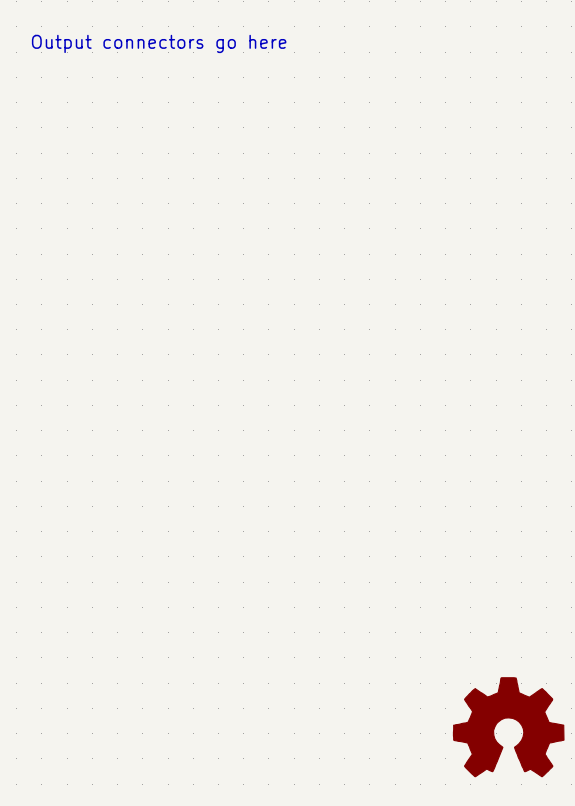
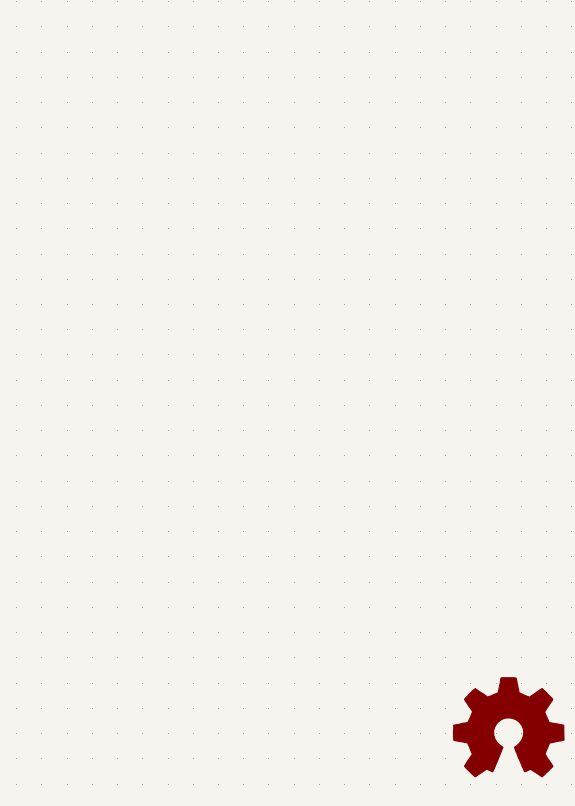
text: Output connectors go here (159, 43) -> none

